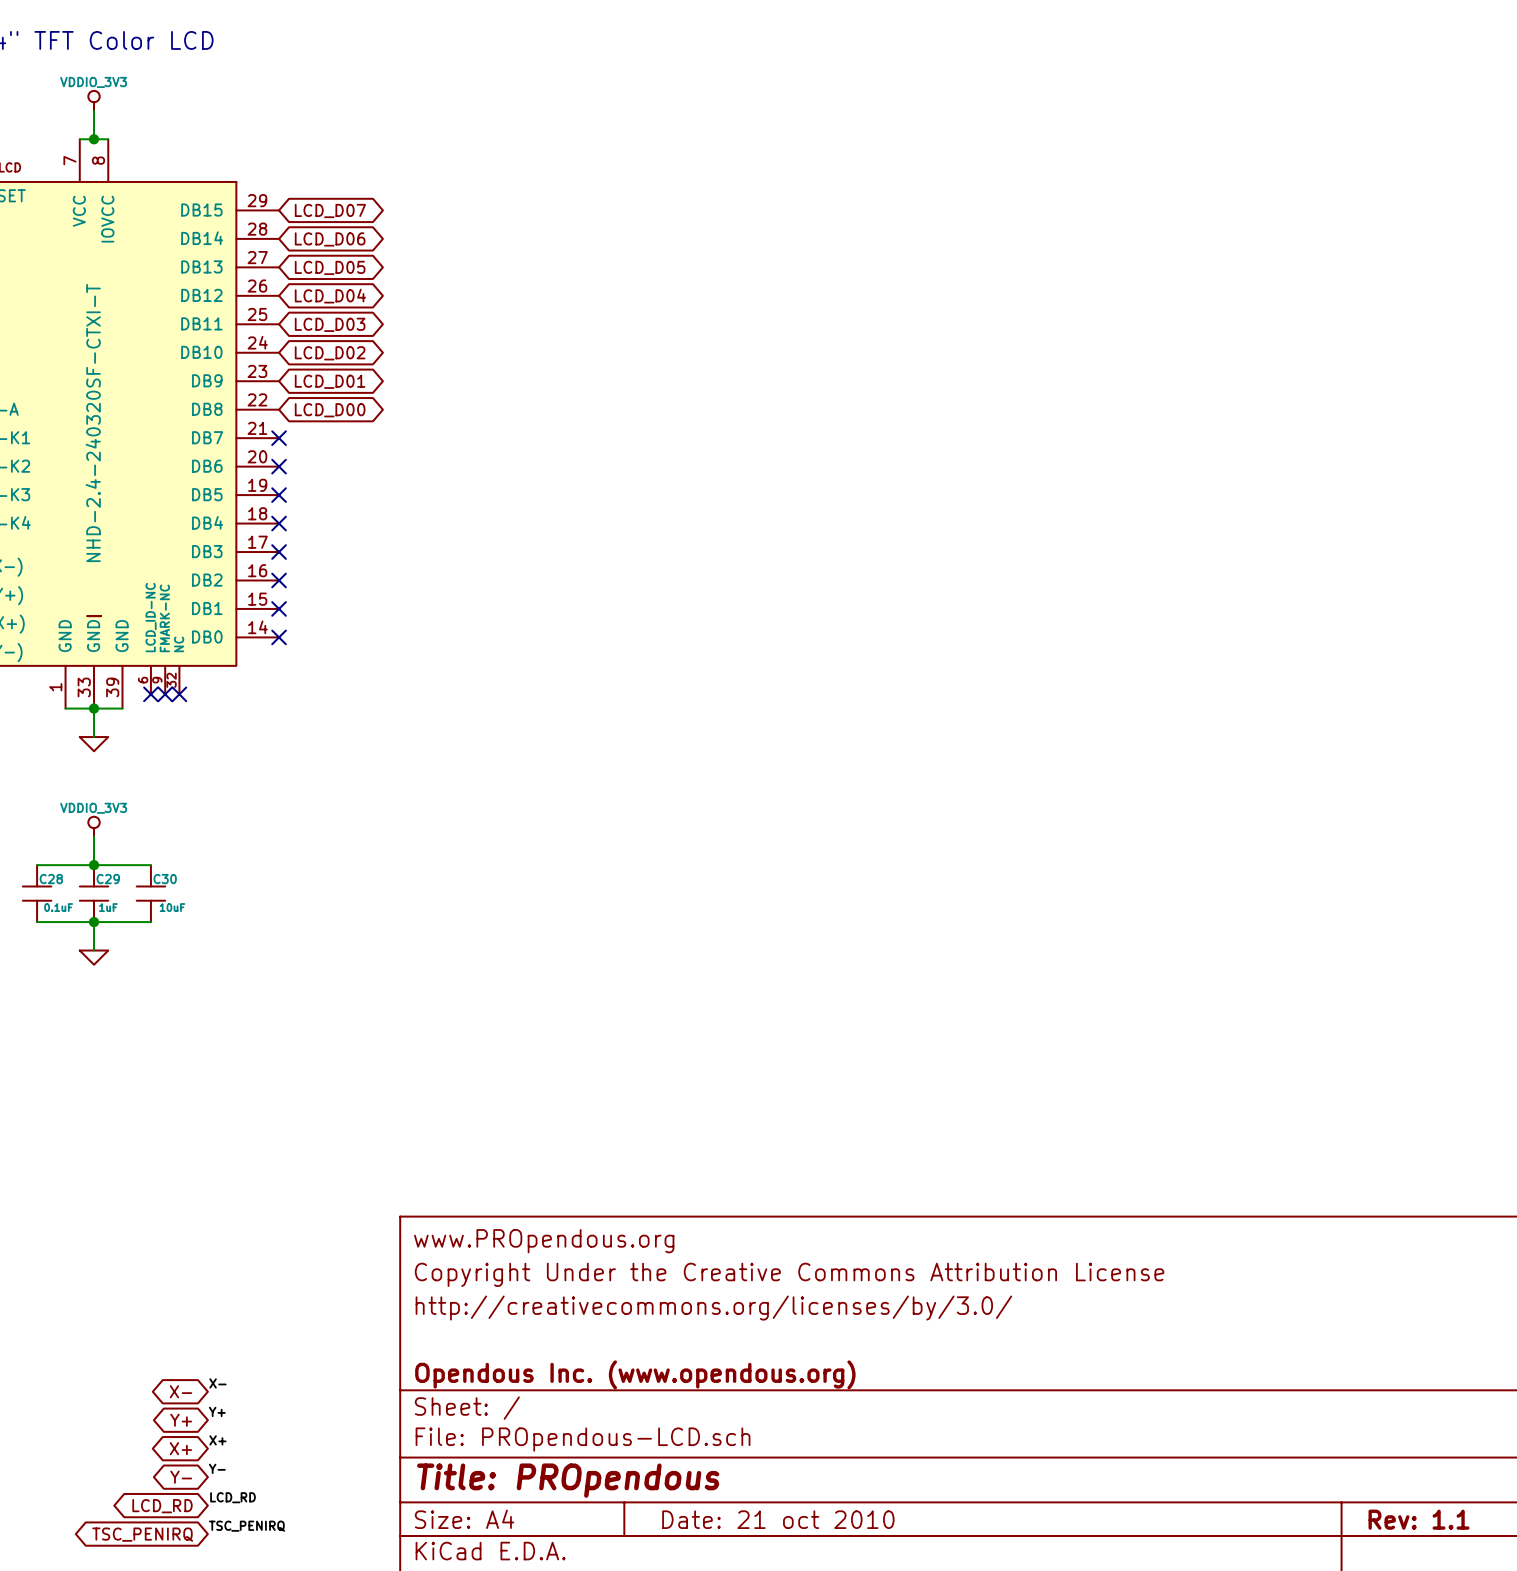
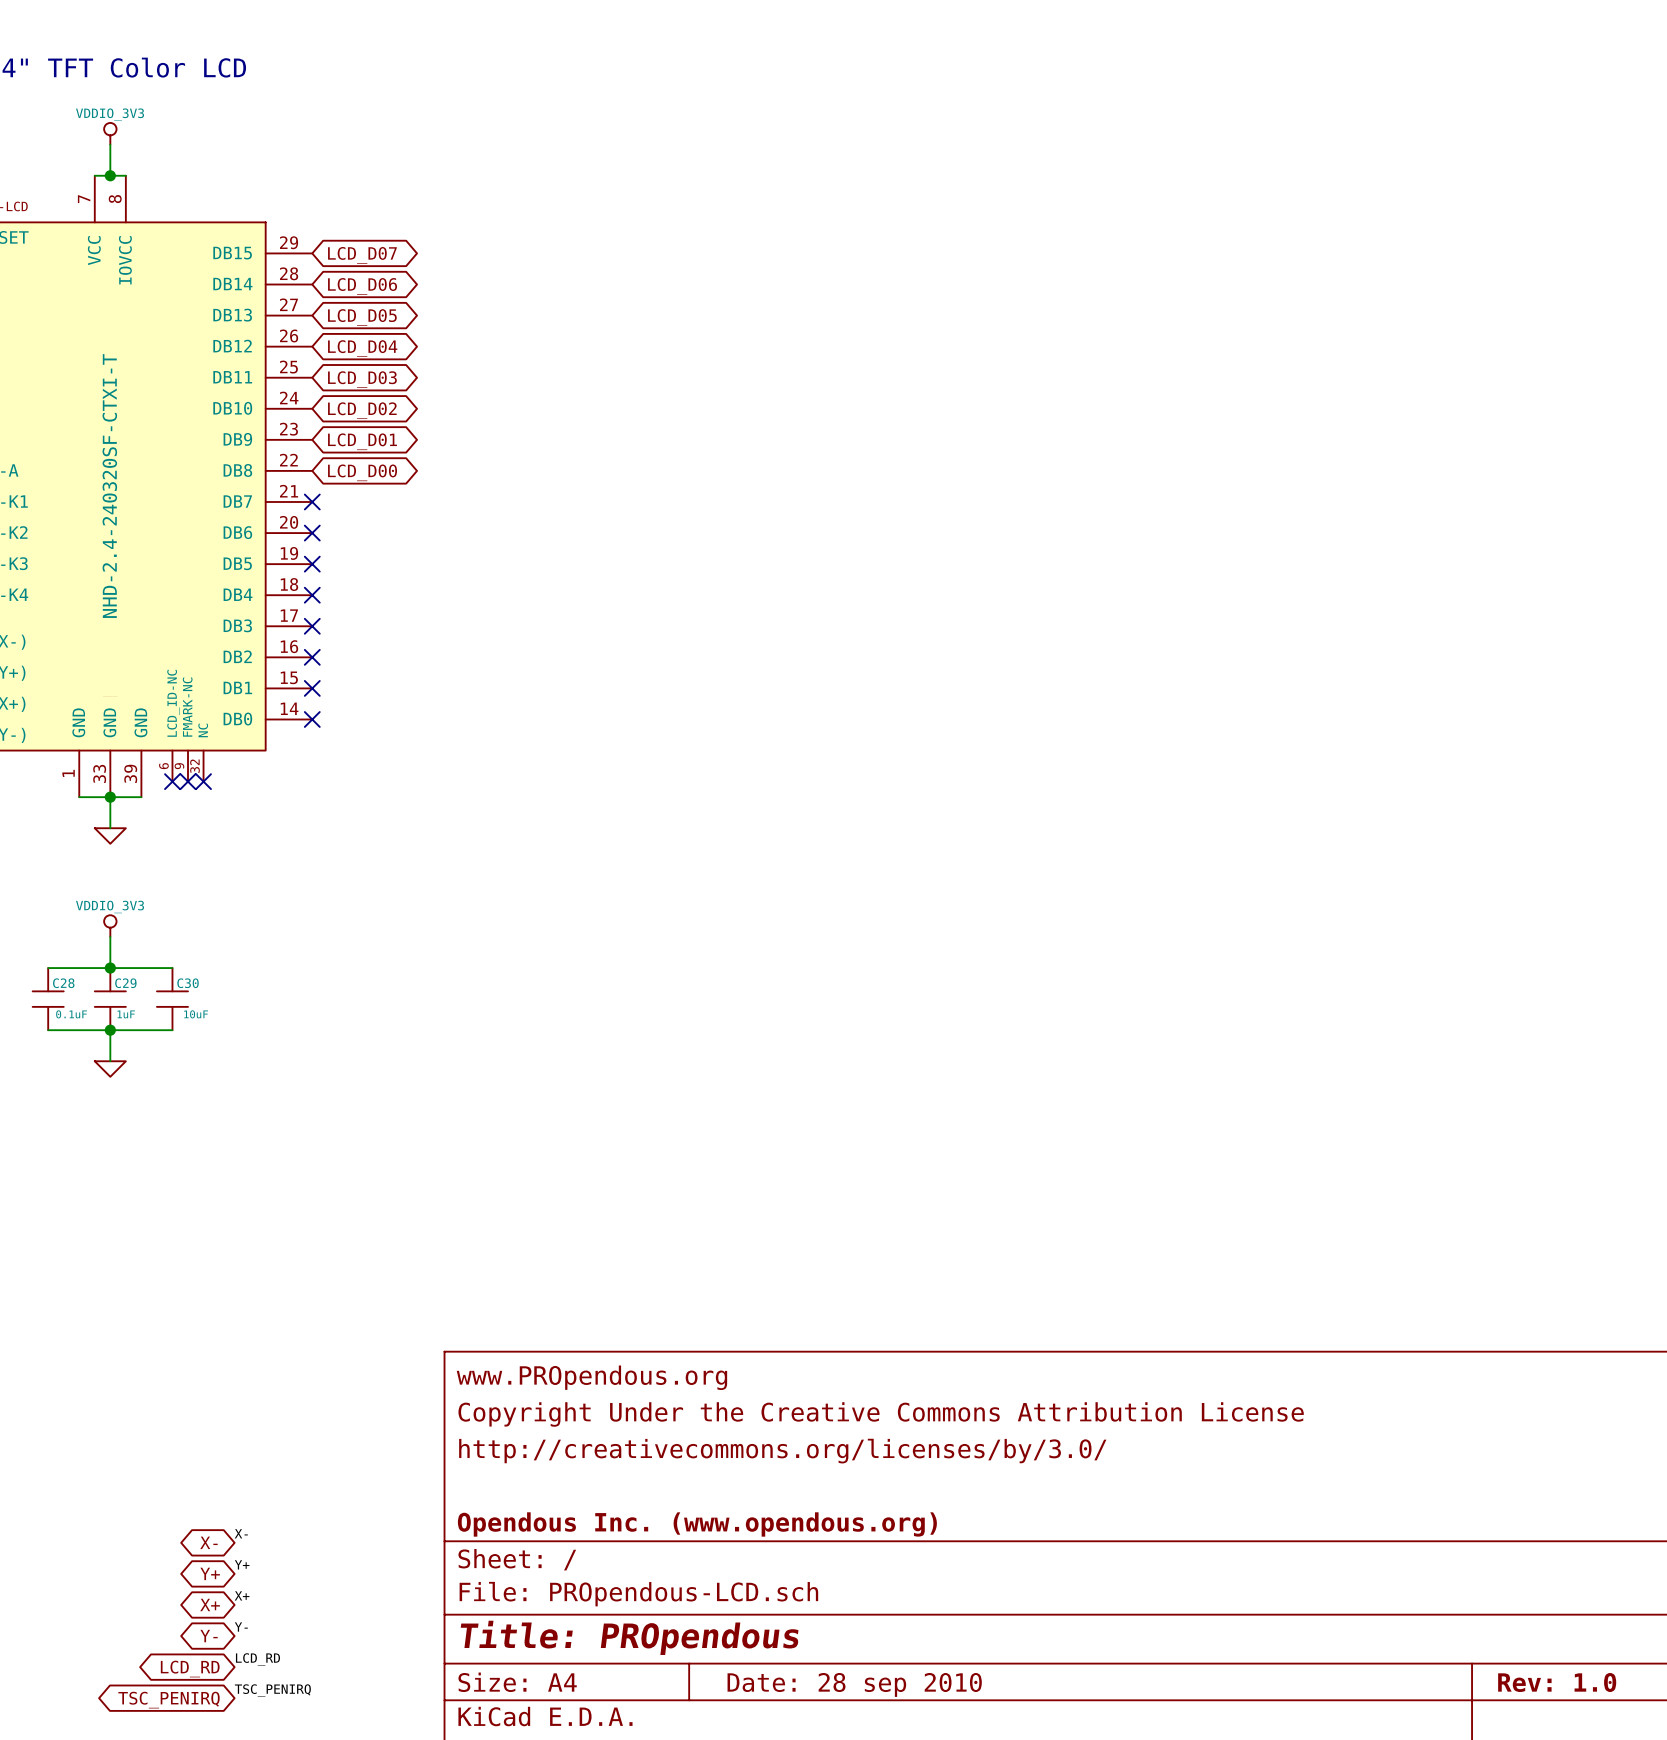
title block: Date: 21 oct 2010 (778, 1519) -> Date: 28 sep 2010 (854, 1684)
title block: Rev: 1.1 (1419, 1519) -> Rev: 1.0 (1557, 1682)

